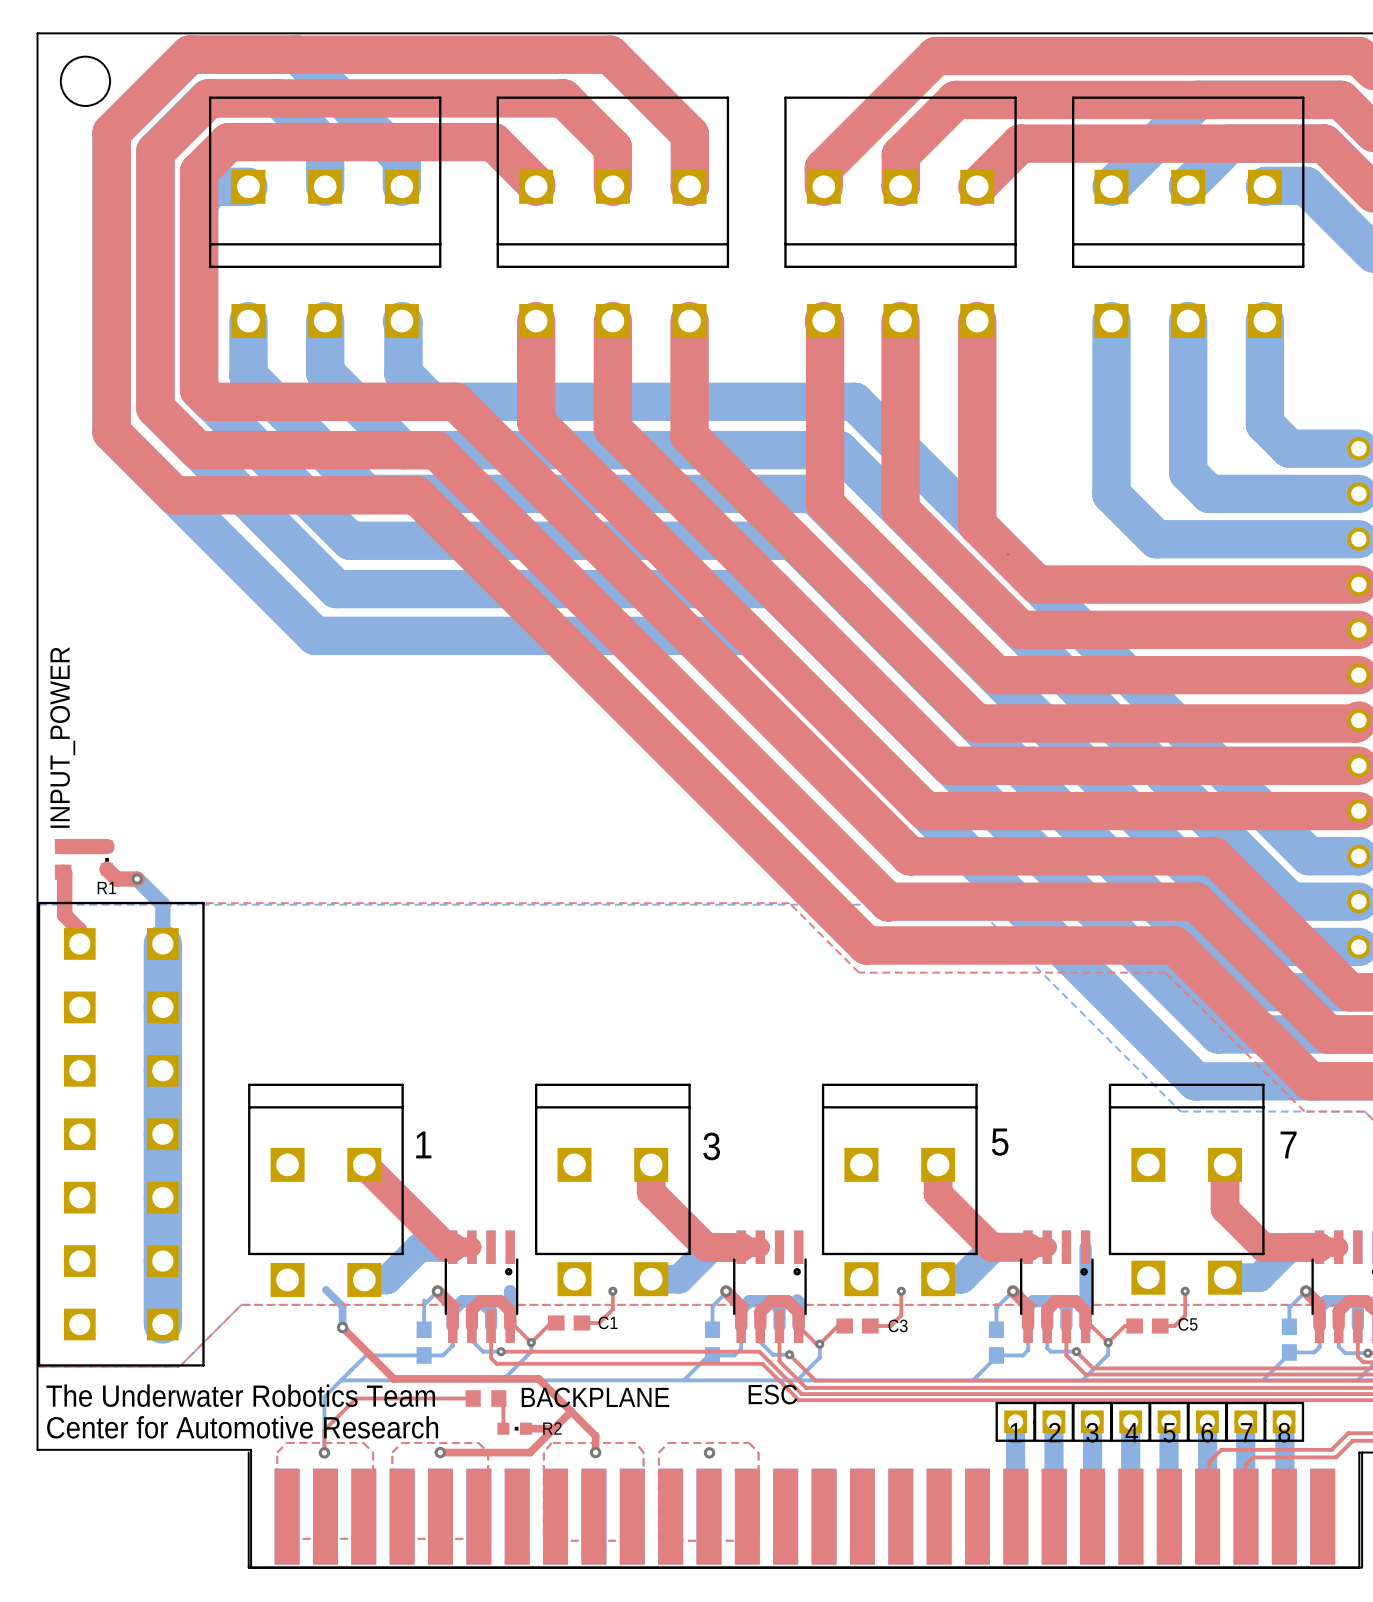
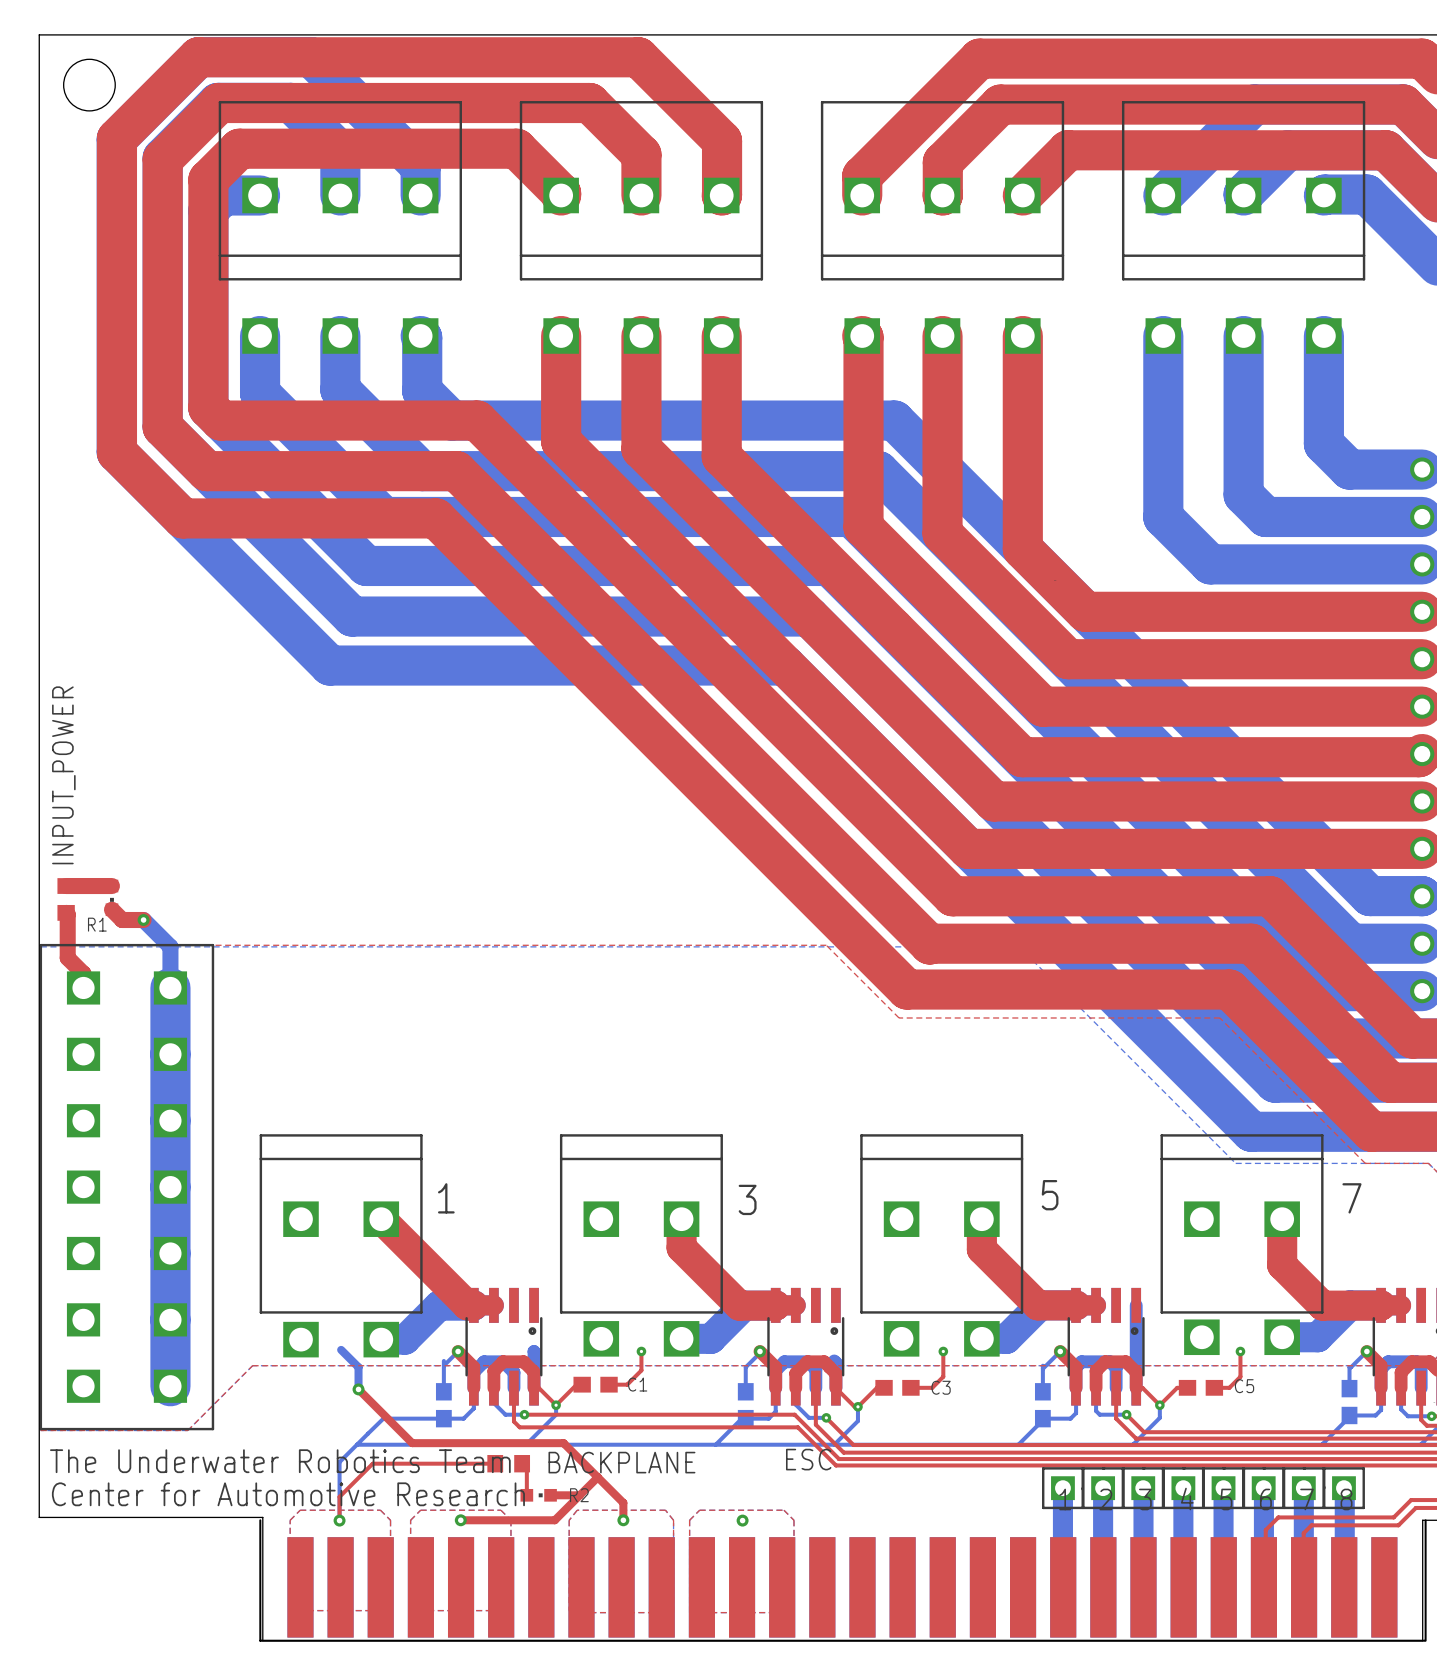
text position: R1 (106, 887) -> R1 (97, 924)

